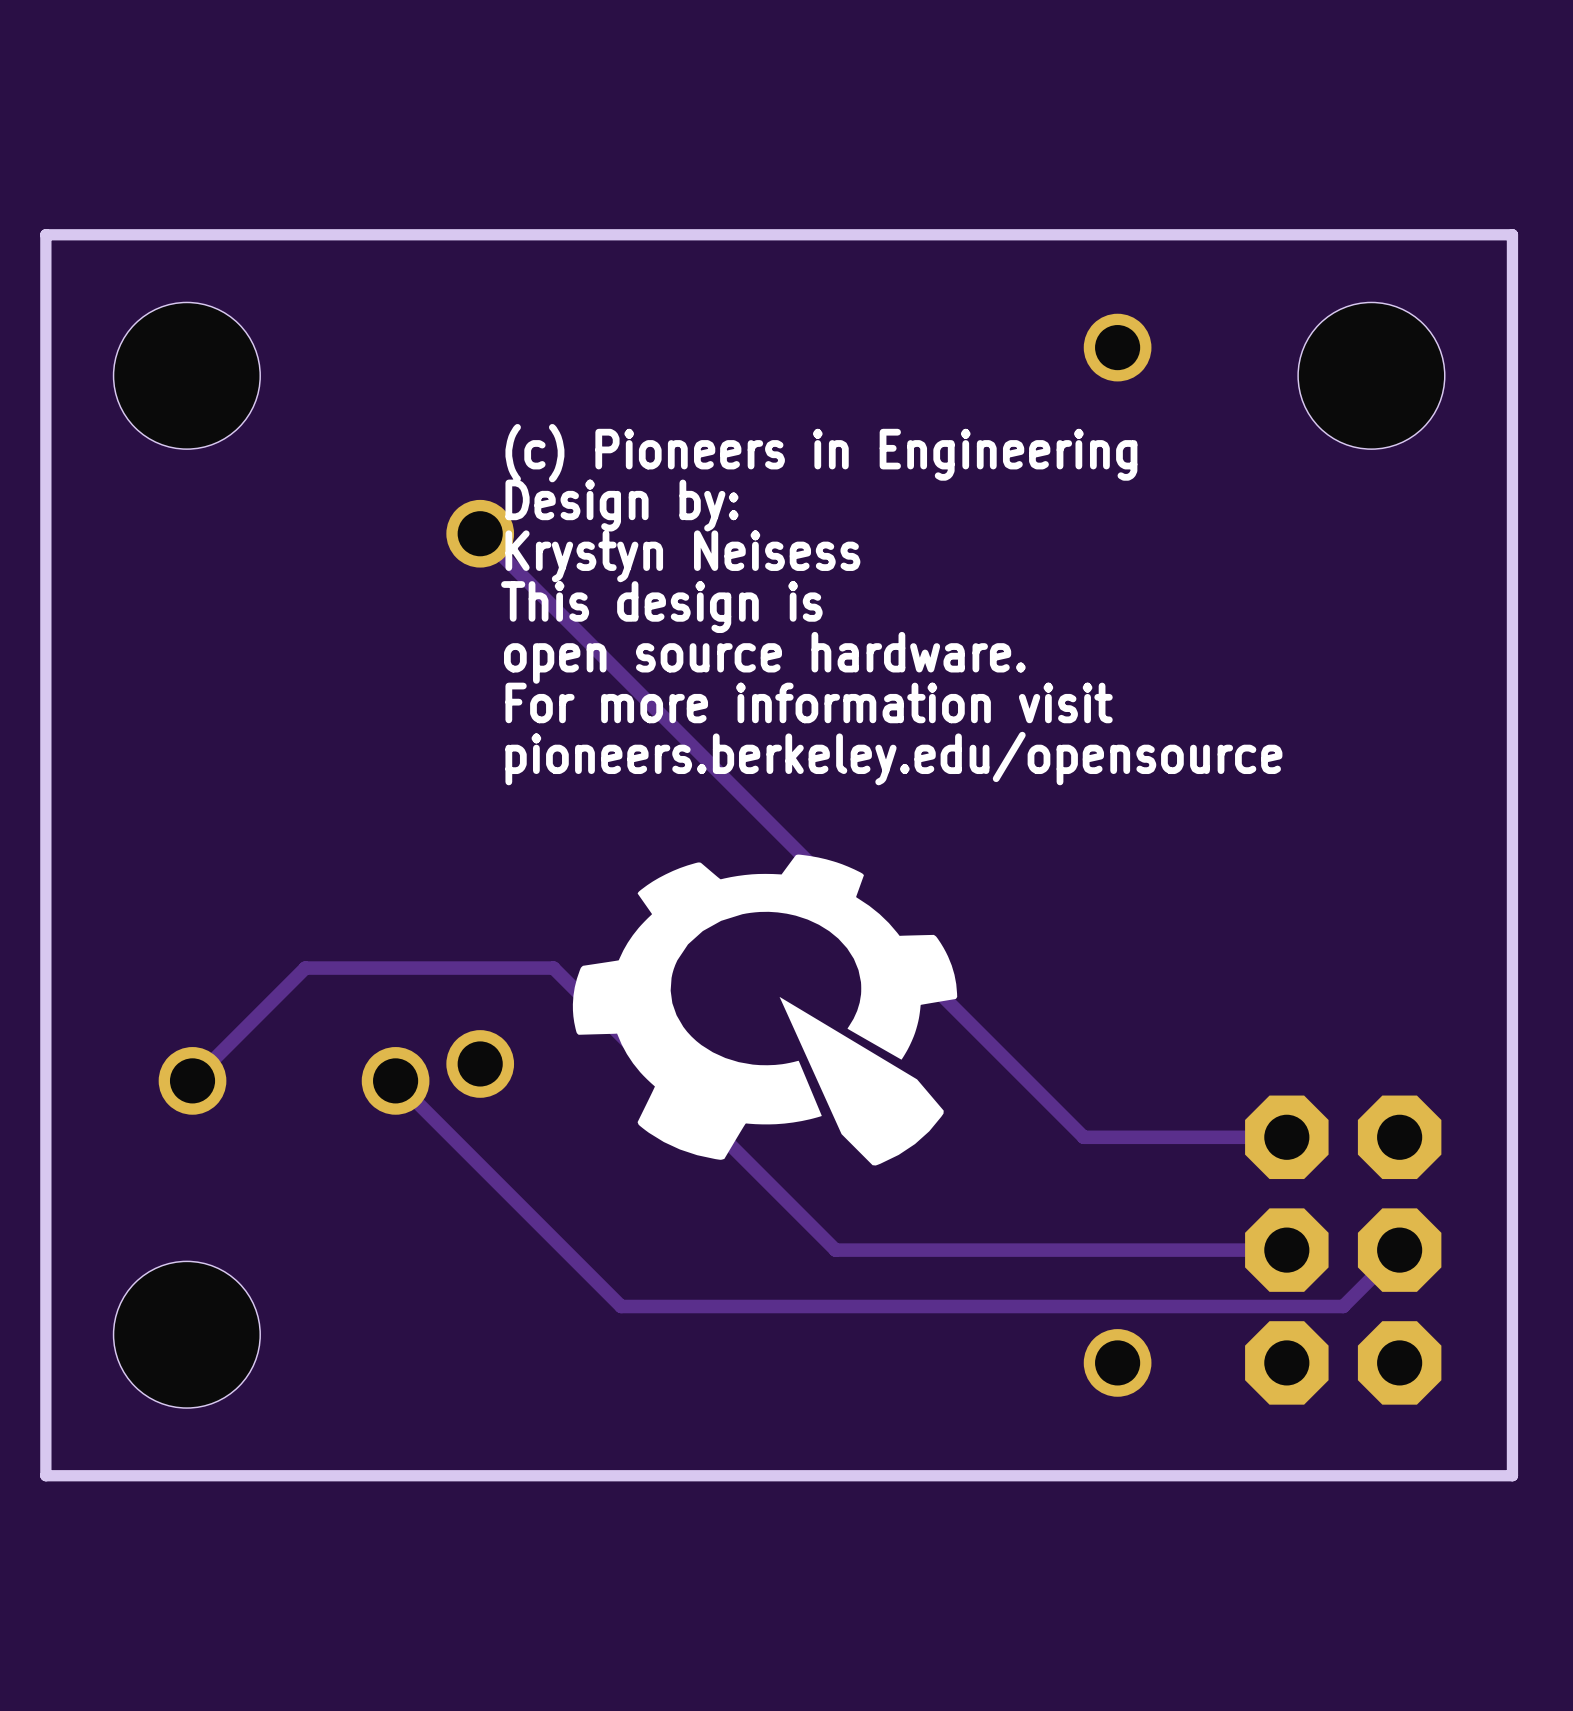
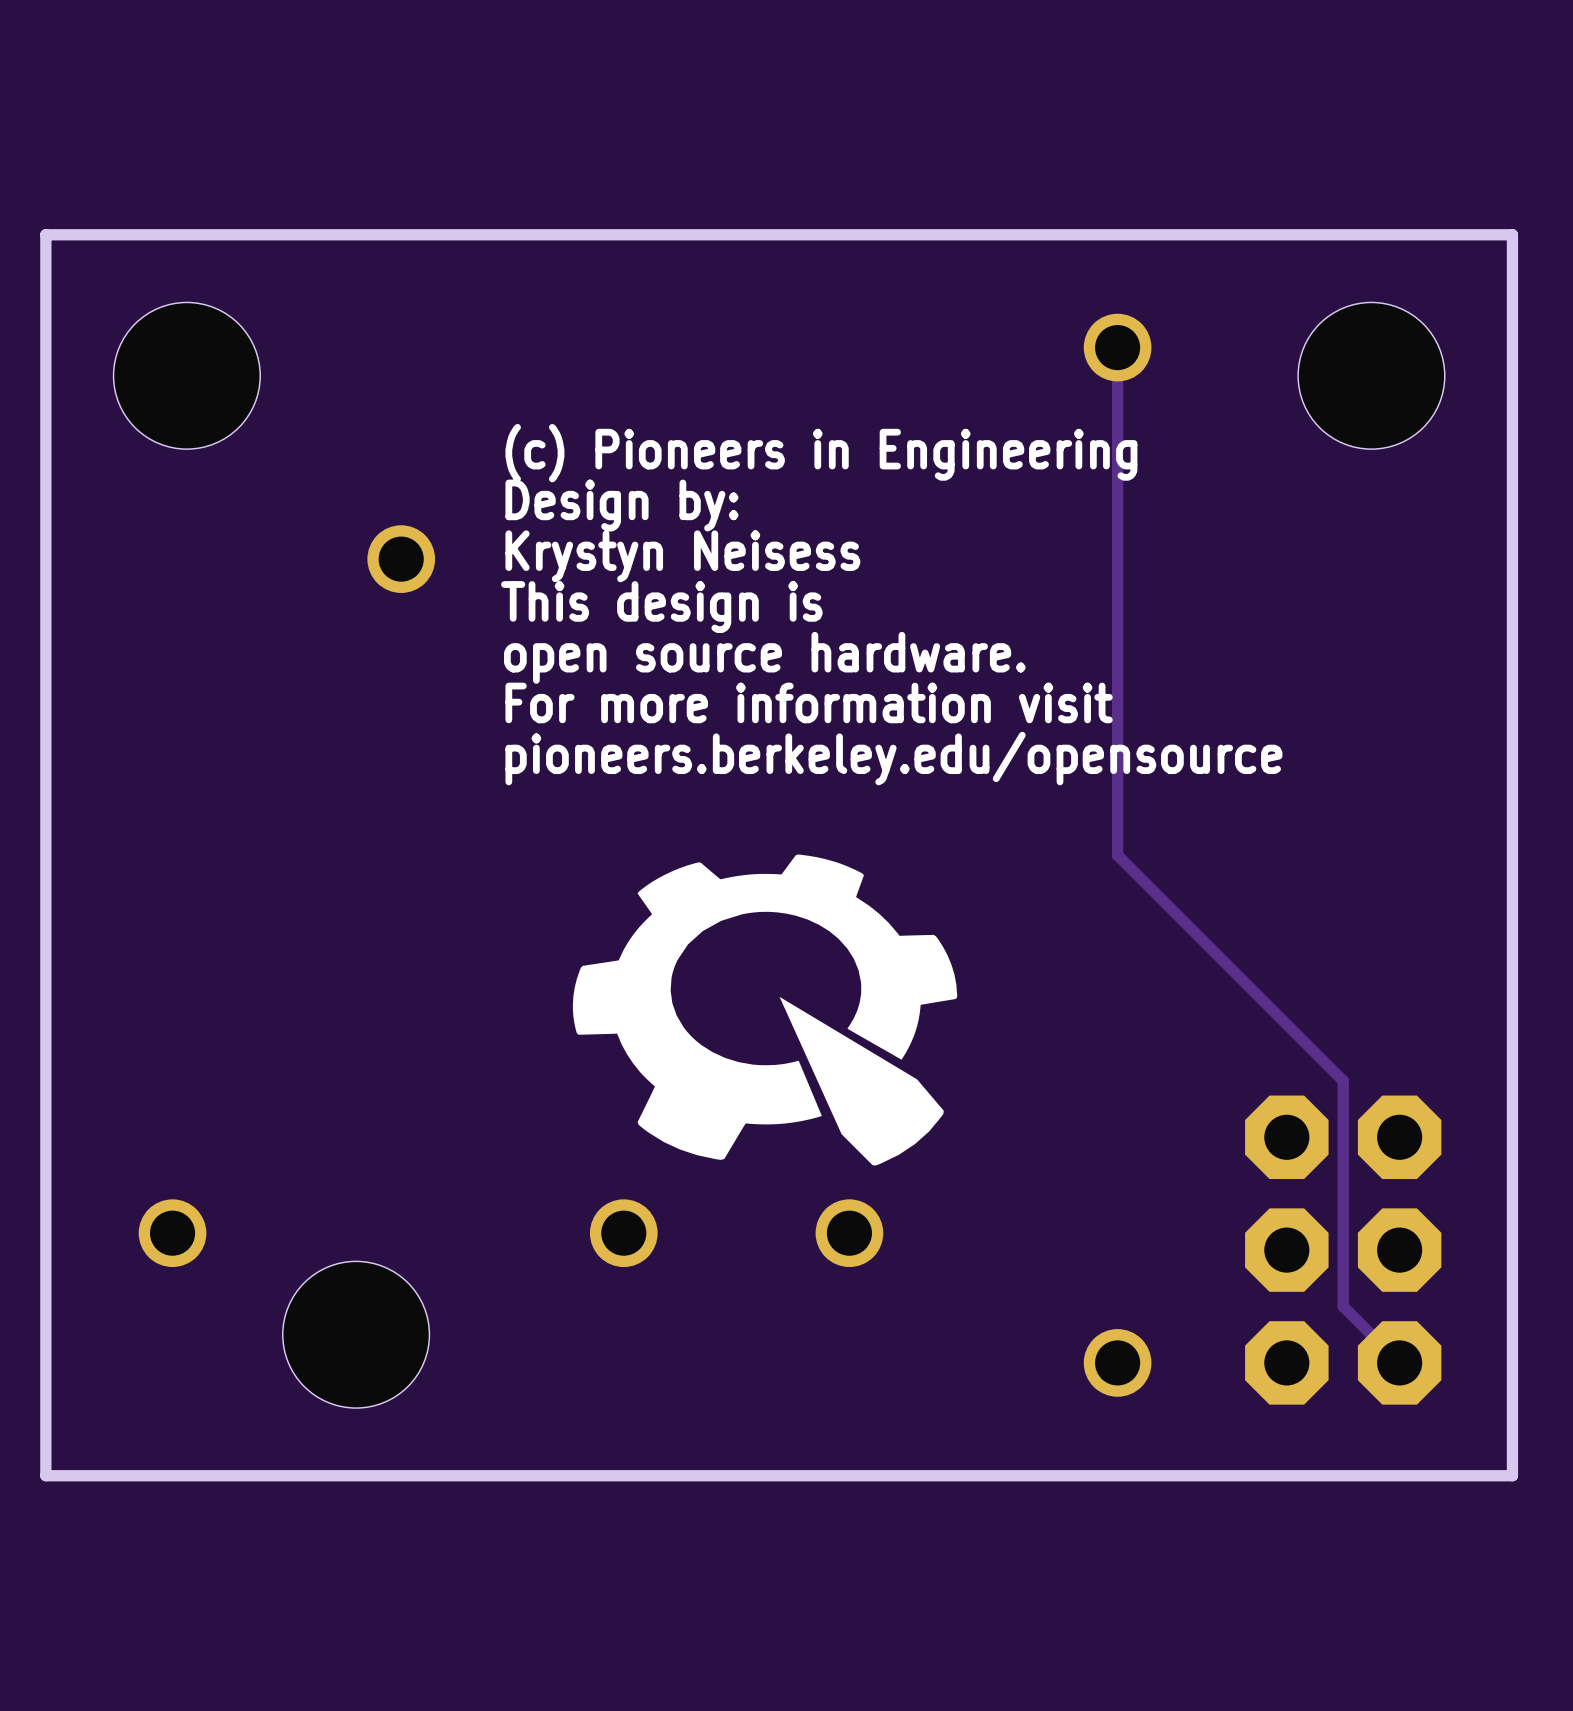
track: none -> (1117, 347) (1117, 855) (1343, 1080) (1343, 1306) (1399, 1362)
track: (480, 533) (1083, 1137) (1286, 1137) -> none
part position: (480, 533) -> (401, 559)
part: (480, 1063) -> none
track: (192, 1080) (305, 968) (553, 968) (835, 1250) (1286, 1250) -> none
part: (192, 1080) -> none
track: (395, 1080) (621, 1306) (1343, 1306) (1399, 1250) -> none
part: (395, 1080) -> none
part: none -> (172, 1233)
part: none -> (623, 1233)
part: none -> (849, 1233)
part position: (186, 1334) -> (356, 1334)

